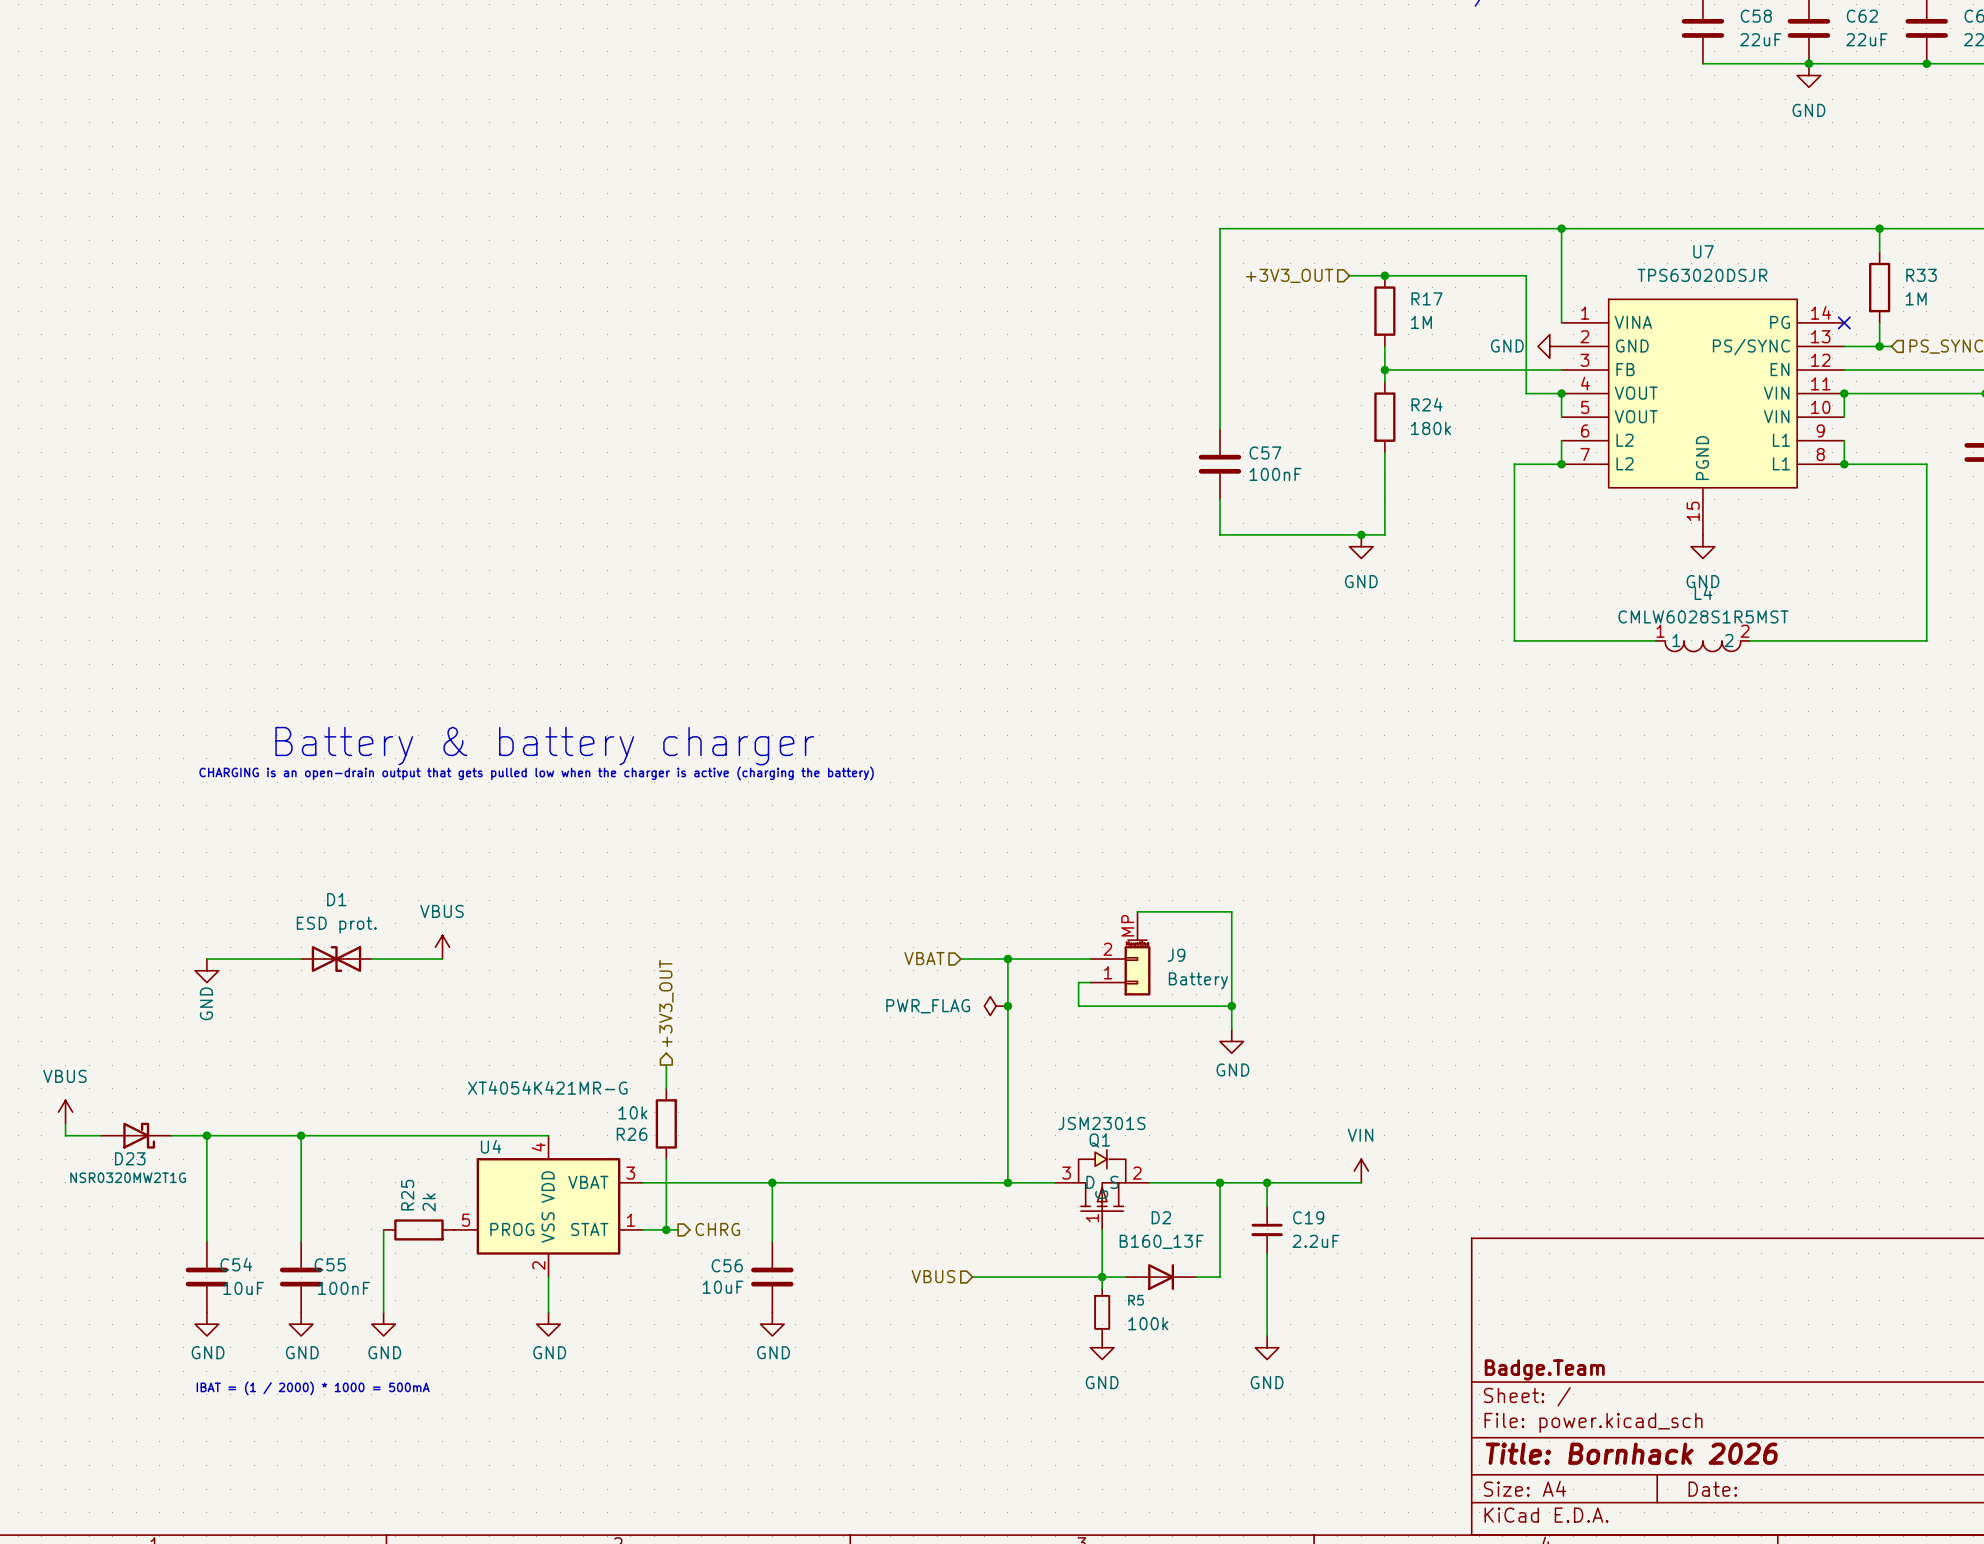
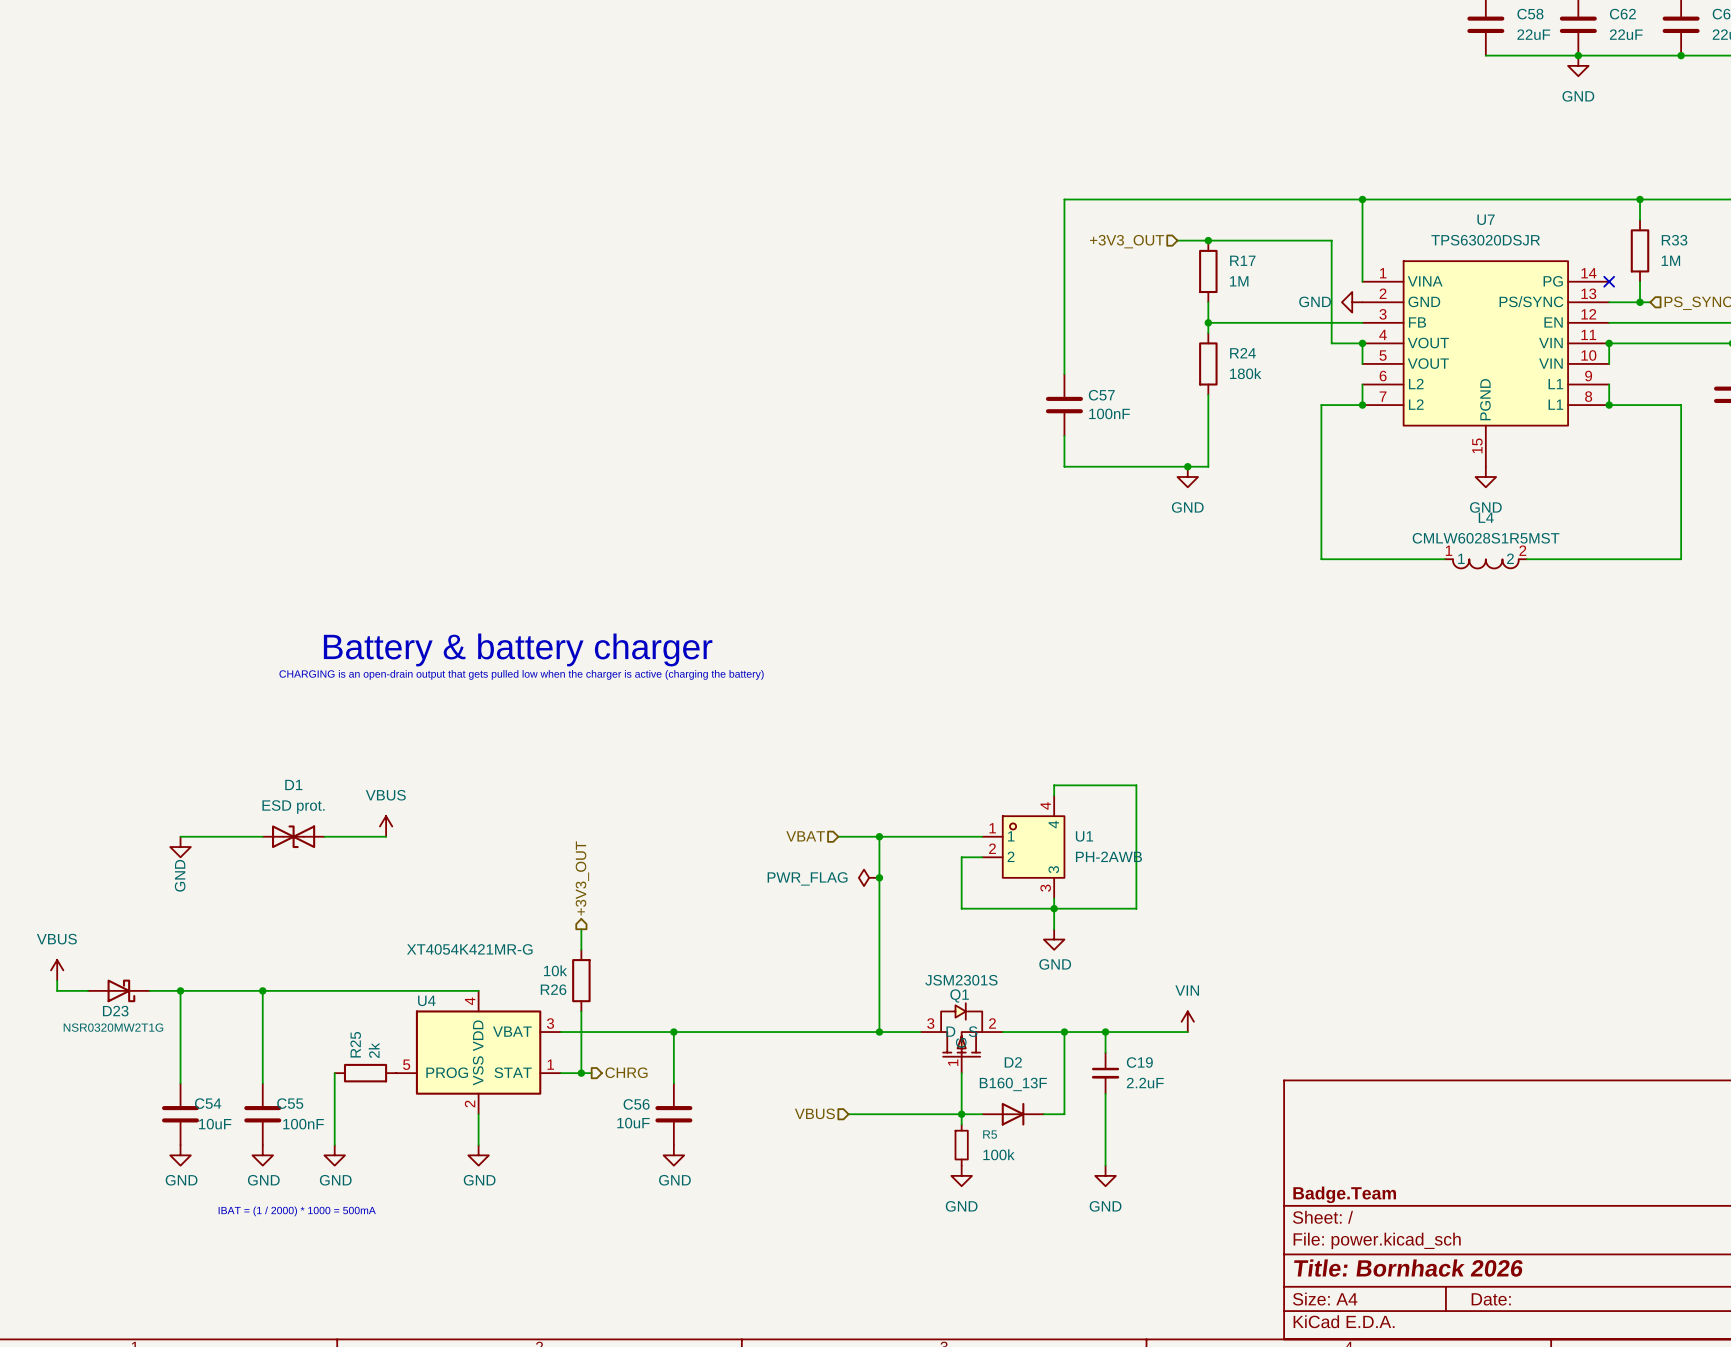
wire: (1137, 911) (1231, 911) (1231, 1029) -> none
wire: none -> (1054, 795) (1054, 785) (1136, 785) (1136, 908) (961, 908) (961, 857) (982, 857)
J9: Battery (1120, 953) -> none
U1: none -> PH-2AWB (1023, 847)
wire: (1090, 982) (1078, 982) (1078, 1006) (1231, 1006) -> none
junction position: (1231, 1006) -> (1054, 908)
wire: none -> (1054, 898) (1054, 929)
power symbol position: GND (1231, 1041) -> GND (1054, 939)

